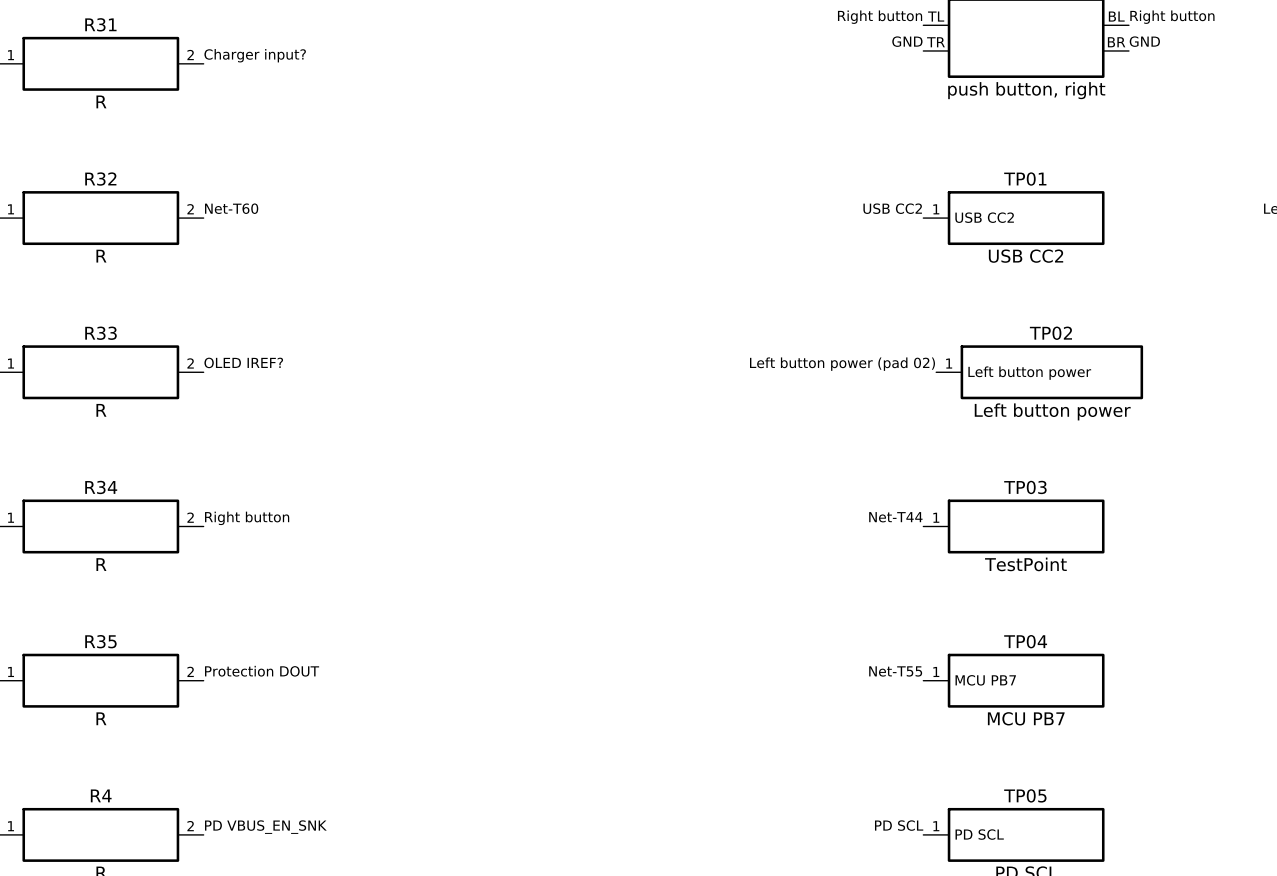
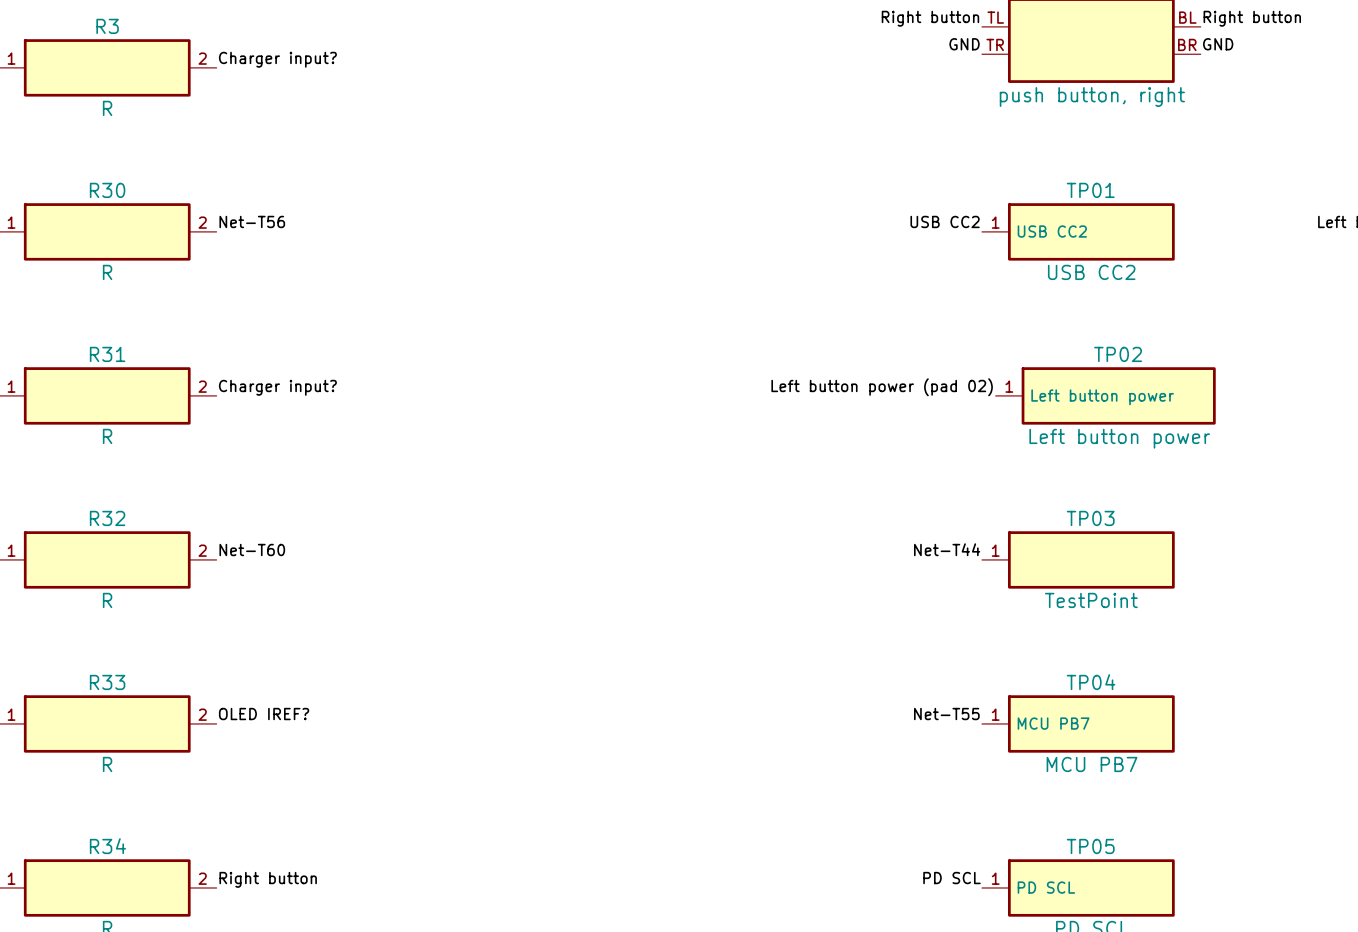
R31 name: R31 (100, 24) -> R3 (107, 26)
R32 name: R32 (100, 179) -> R30 (107, 190)
label: Net-T60 (231, 208) -> Net-T56 (252, 221)
R33 name: R33 (101, 333) -> R31 (107, 354)
label: OLED IREF? (243, 362) -> Charger input? (277, 387)
R34 name: R34 (101, 487) -> R32 (107, 518)
label: Right button (247, 518) -> Net-T60 (252, 550)
R35 name: R35 (100, 641) -> R33 (107, 682)
label: Protection DOUT (262, 671) -> OLED IREF? (264, 714)
R4 name: R4 (101, 795) -> R34 (107, 846)
label: PD VBUS_EN_SNK (265, 827) -> Right button (268, 879)

